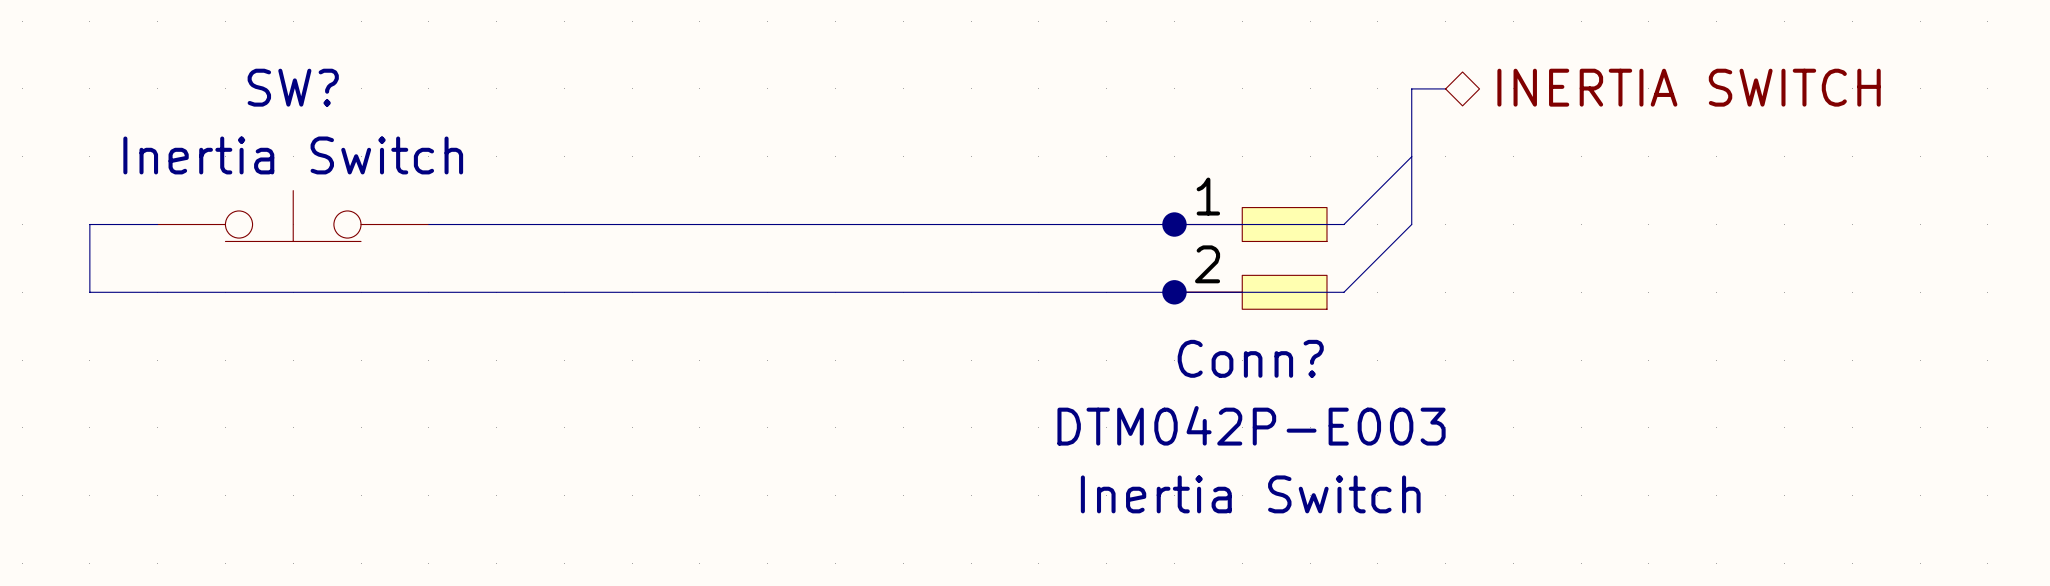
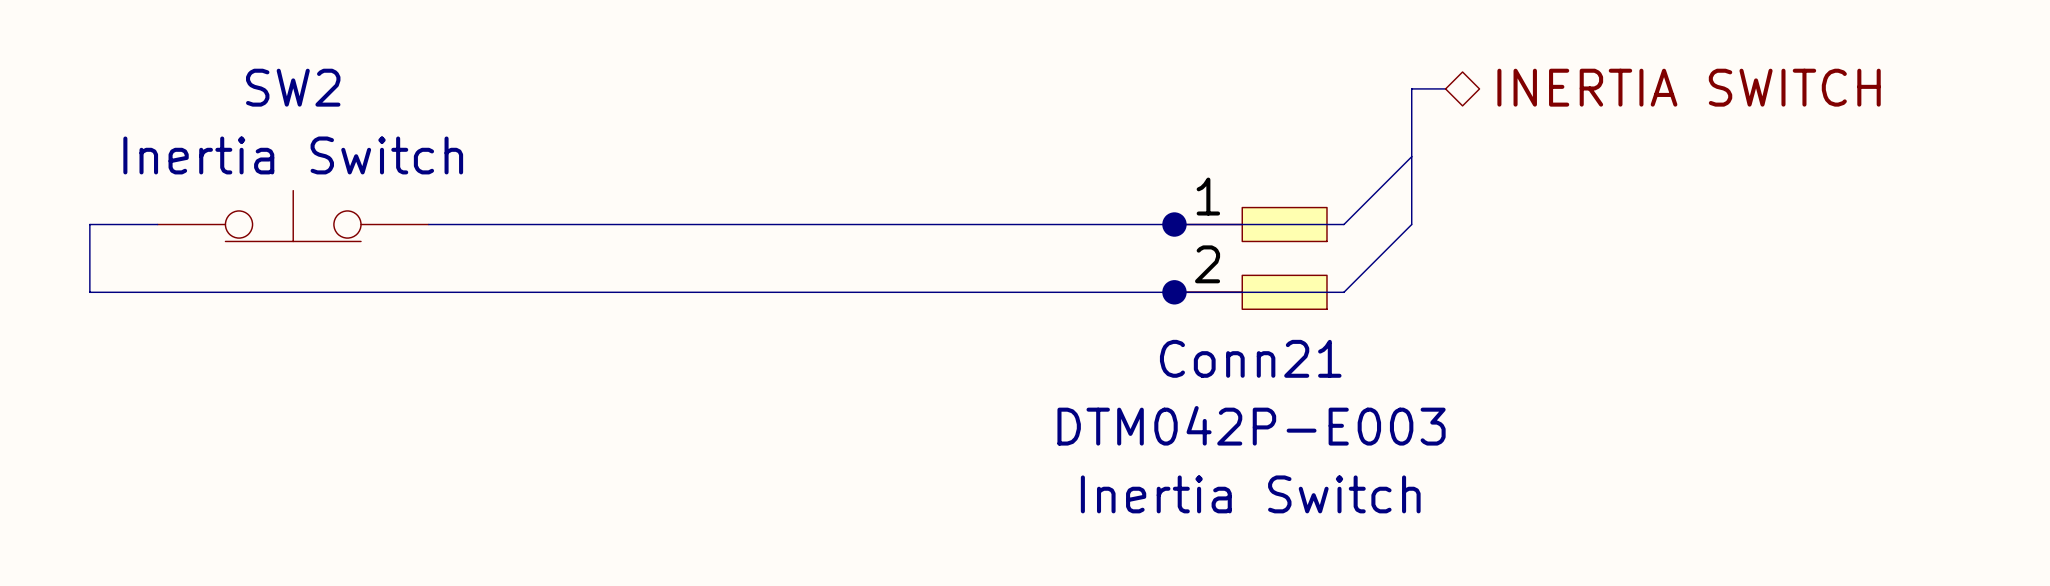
SW? name: SW? (293, 87) -> SW2 (293, 87)
Conn? name: Conn? (1250, 358) -> Conn21 (1250, 358)

